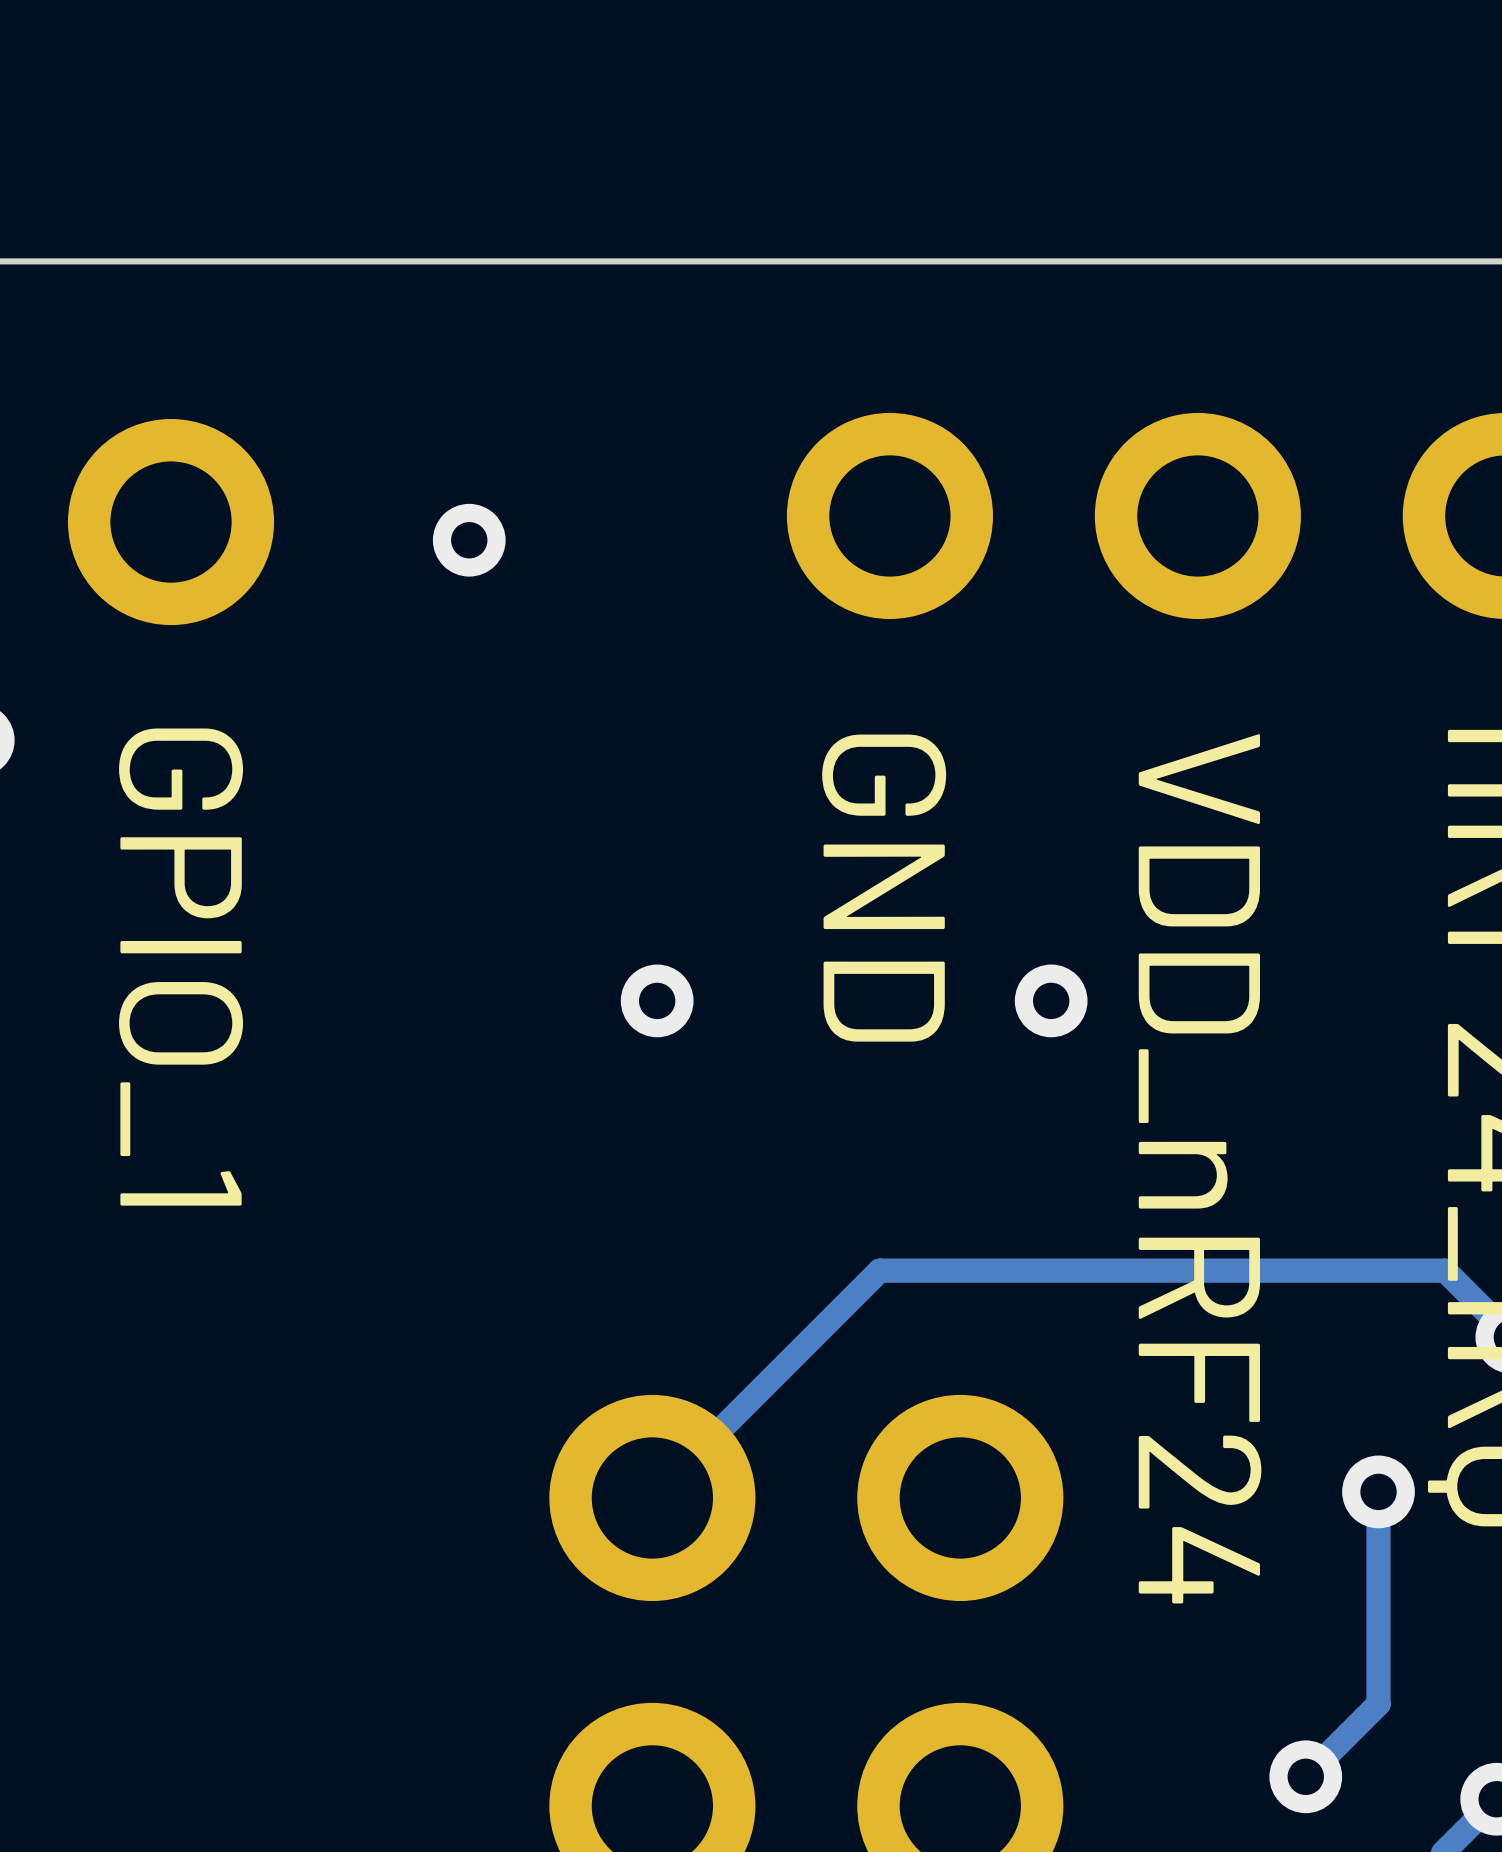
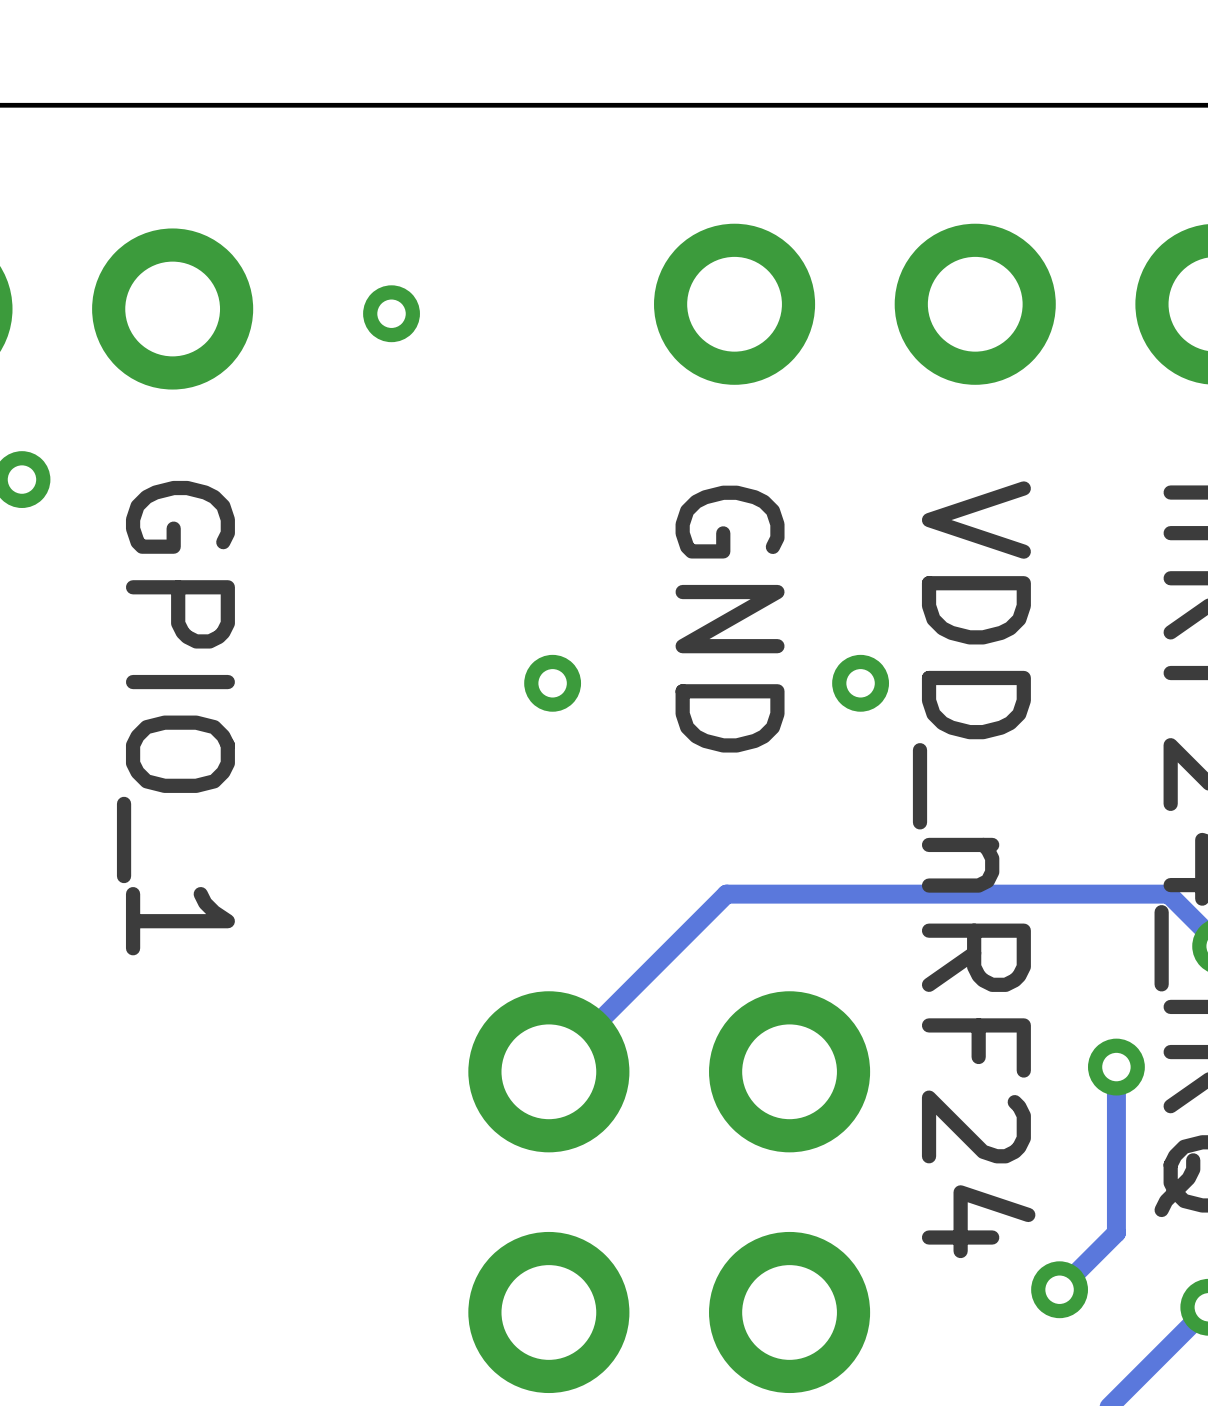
via position: (469, 540) -> (391, 313)

